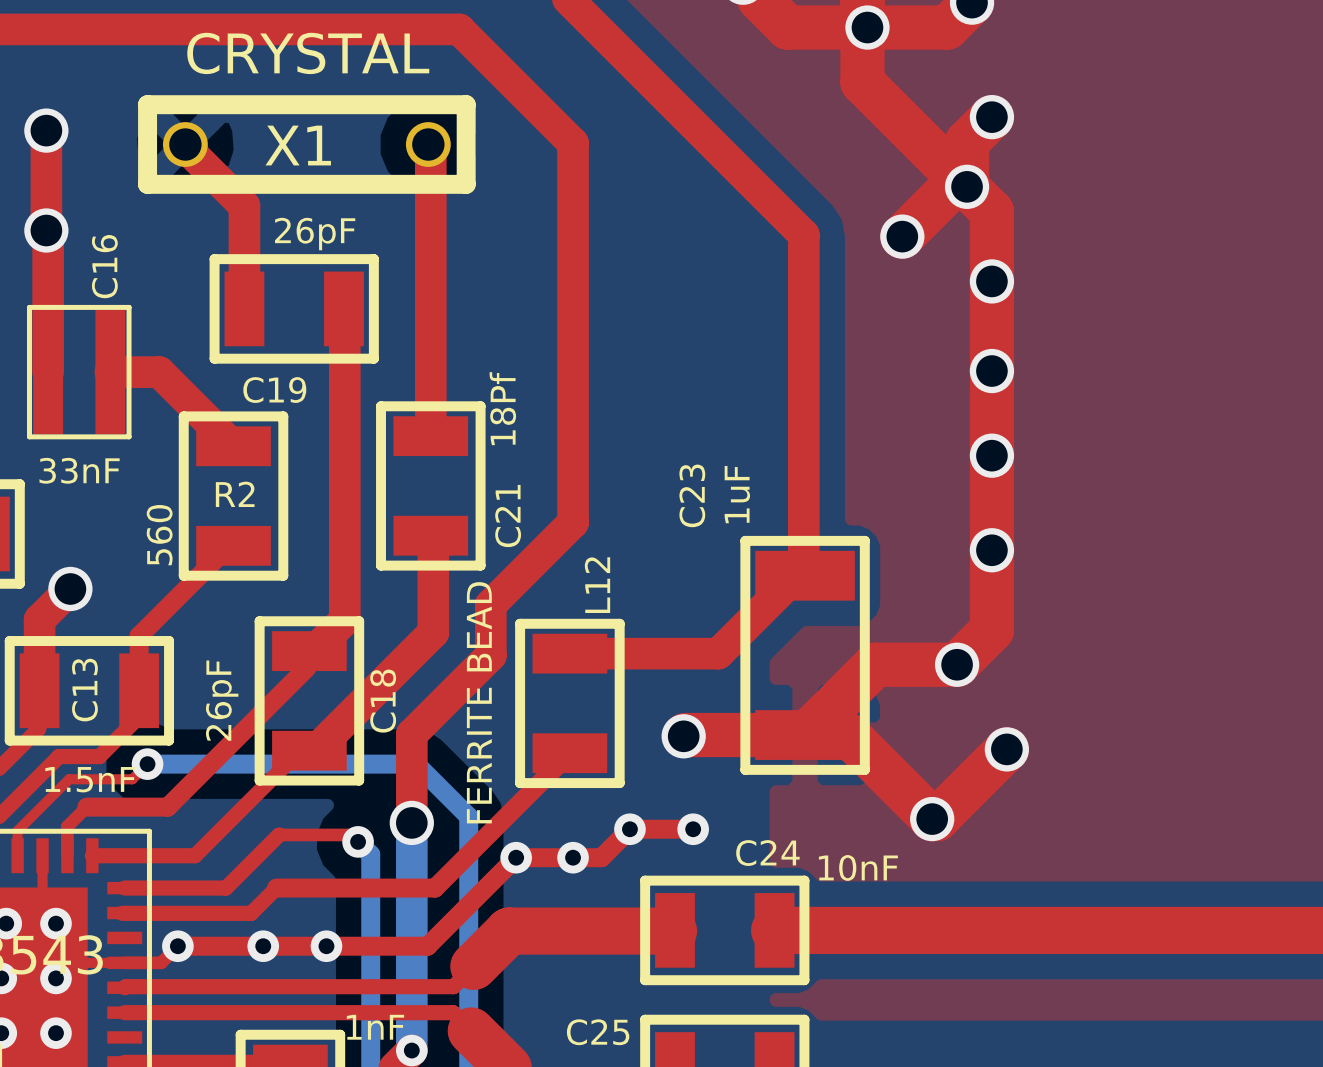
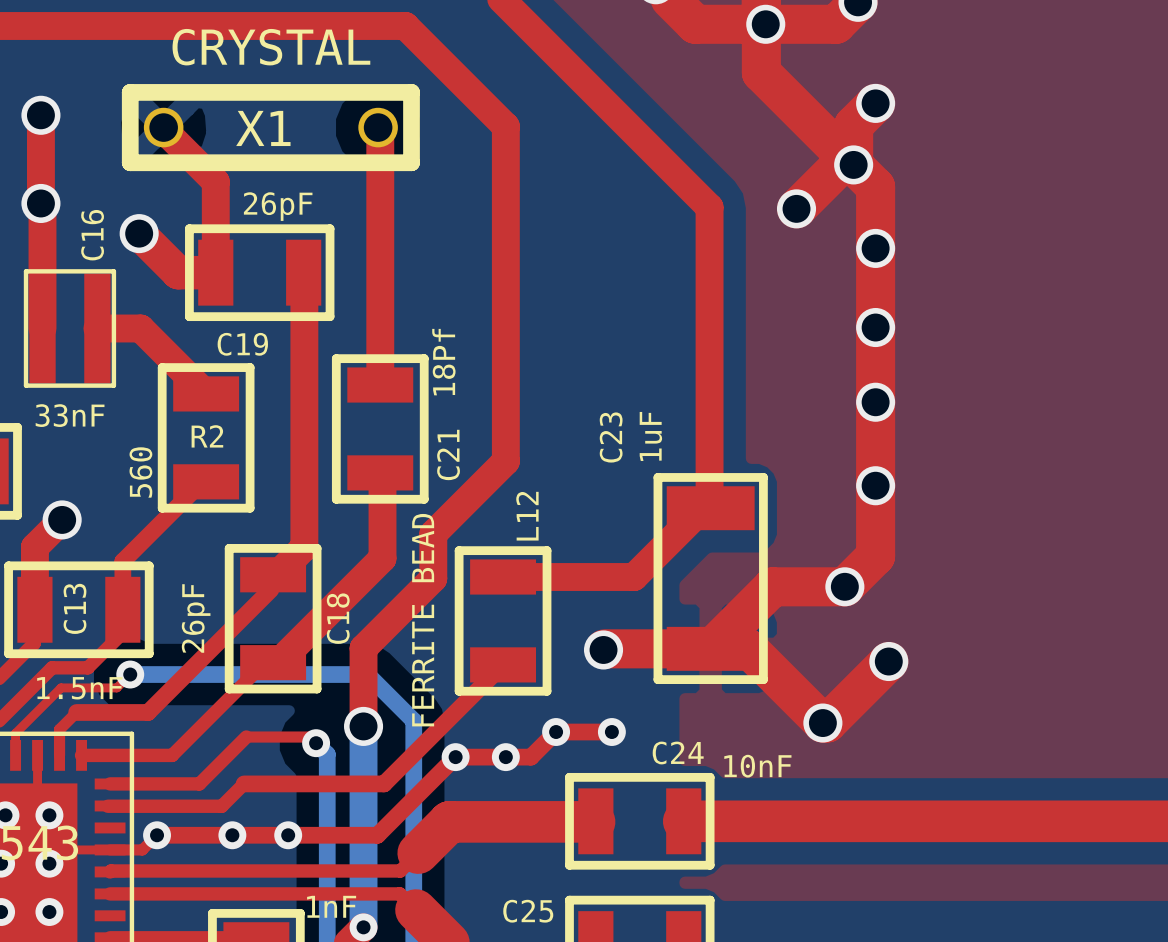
top track: none -> (139, 233) (178, 272) (215, 272)
via: none -> (139, 233)

